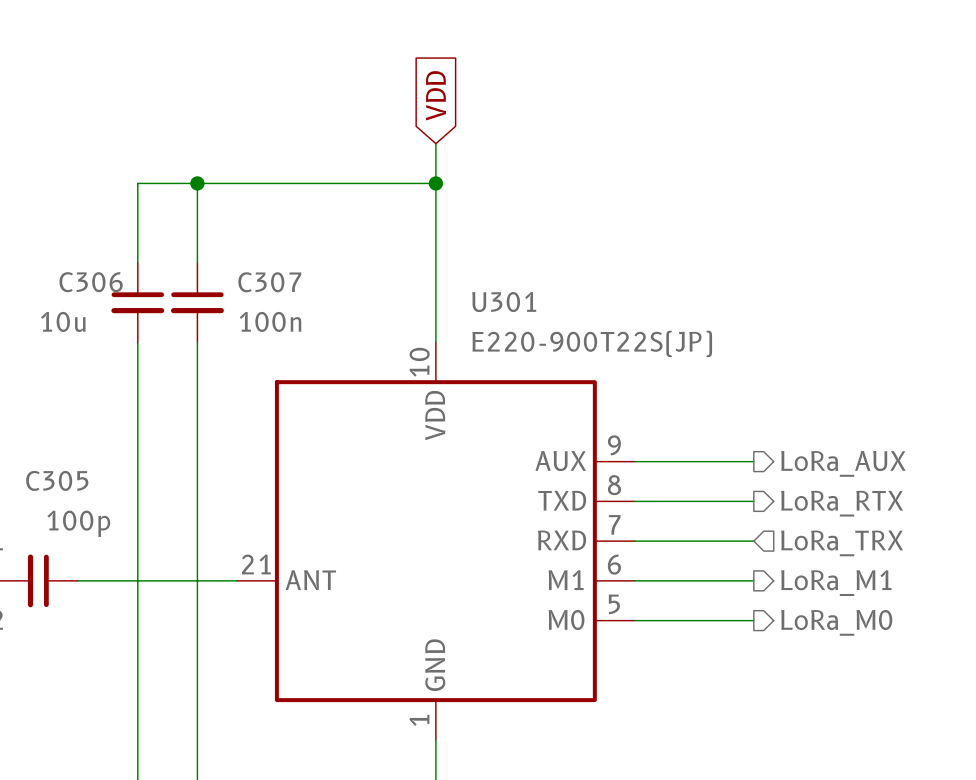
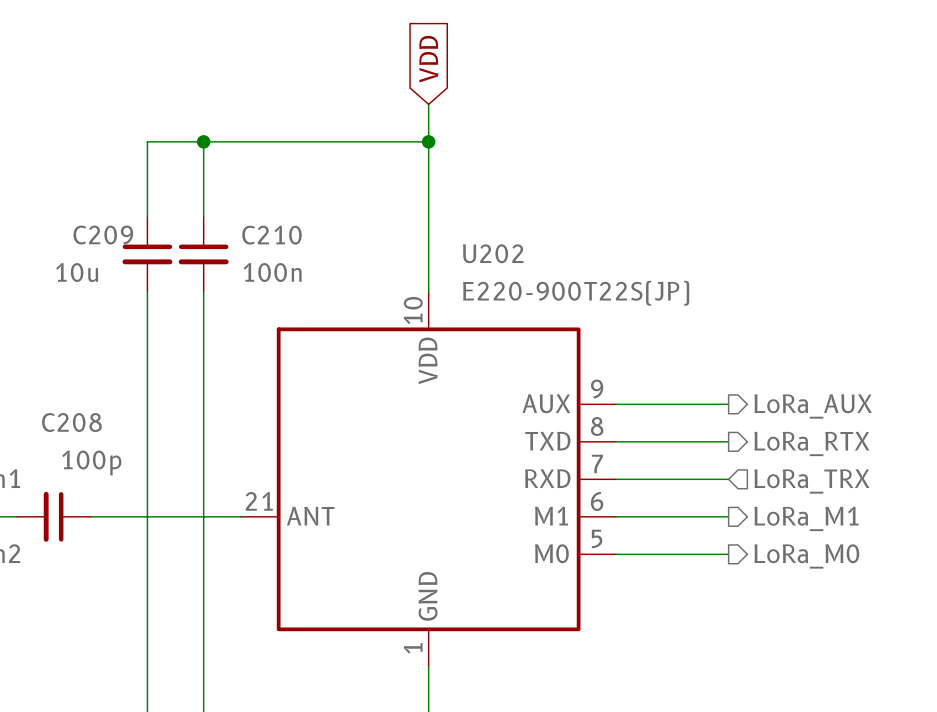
C306 name: C306 (91, 282) -> C209 (103, 235)
C307 name: C307 (269, 282) -> C210 (271, 235)
U301 name: U301 (504, 302) -> U202 (493, 253)
C305 name: C305 (57, 480) -> C208 (71, 422)

